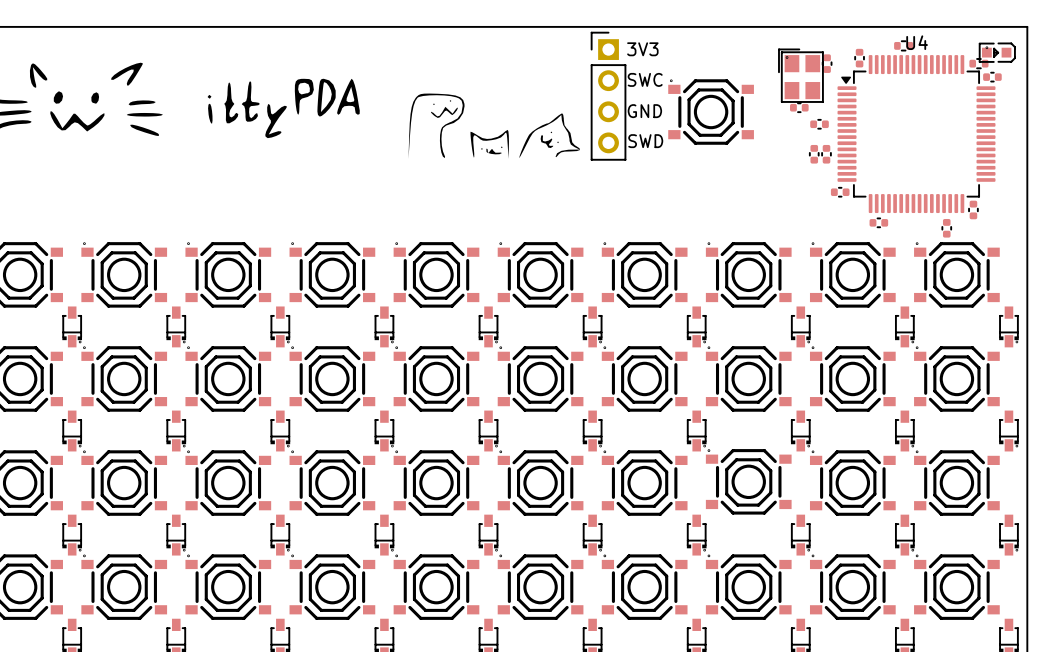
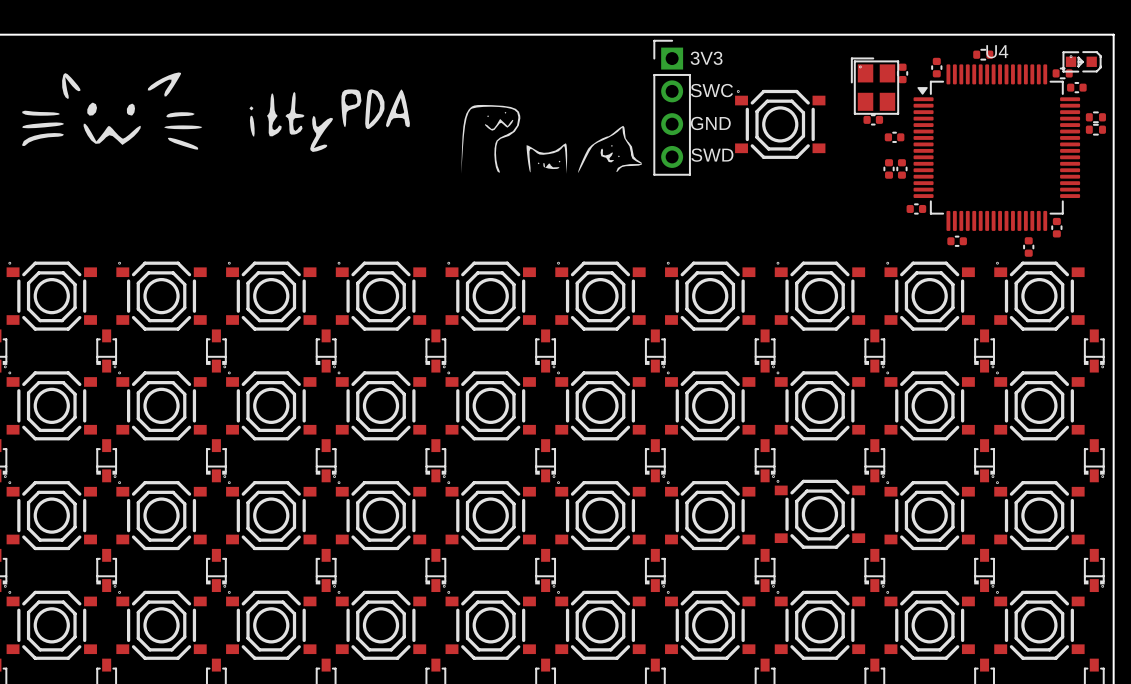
part: none -> (1095, 117)
part: none -> (1095, 129)

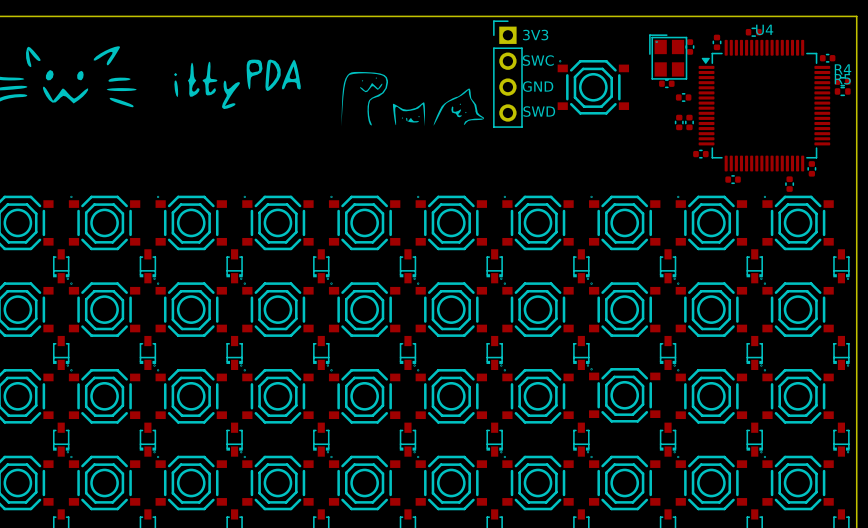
part: (1082, 61) -> none
part: (1062, 73) -> none
R4 name: none -> R4 (842, 69)
R5 name: none -> R5 (842, 79)

